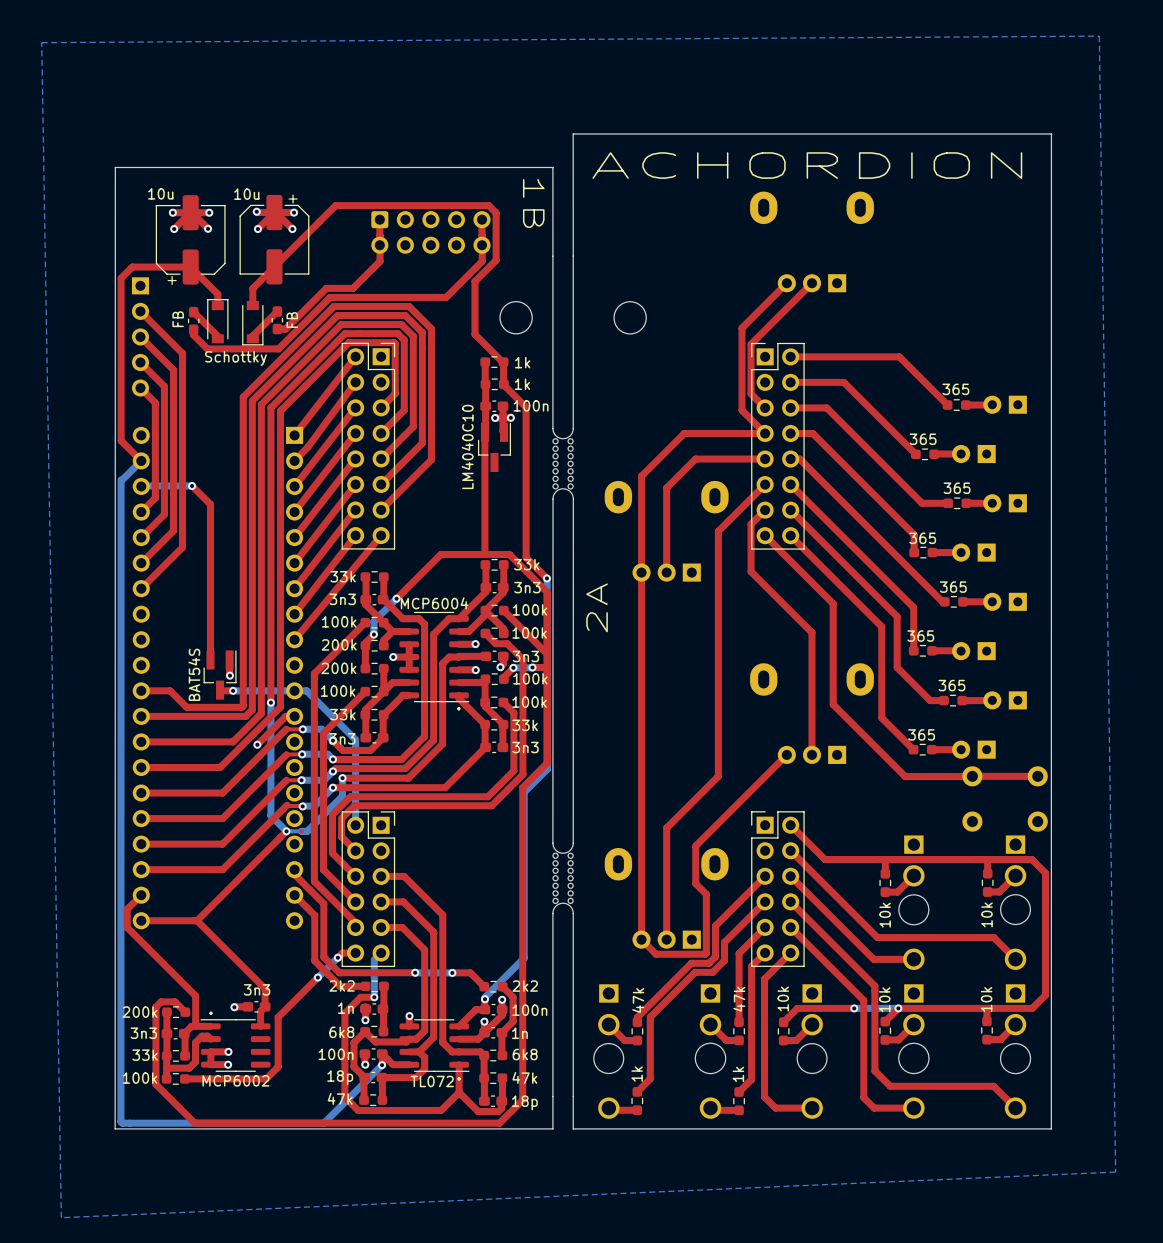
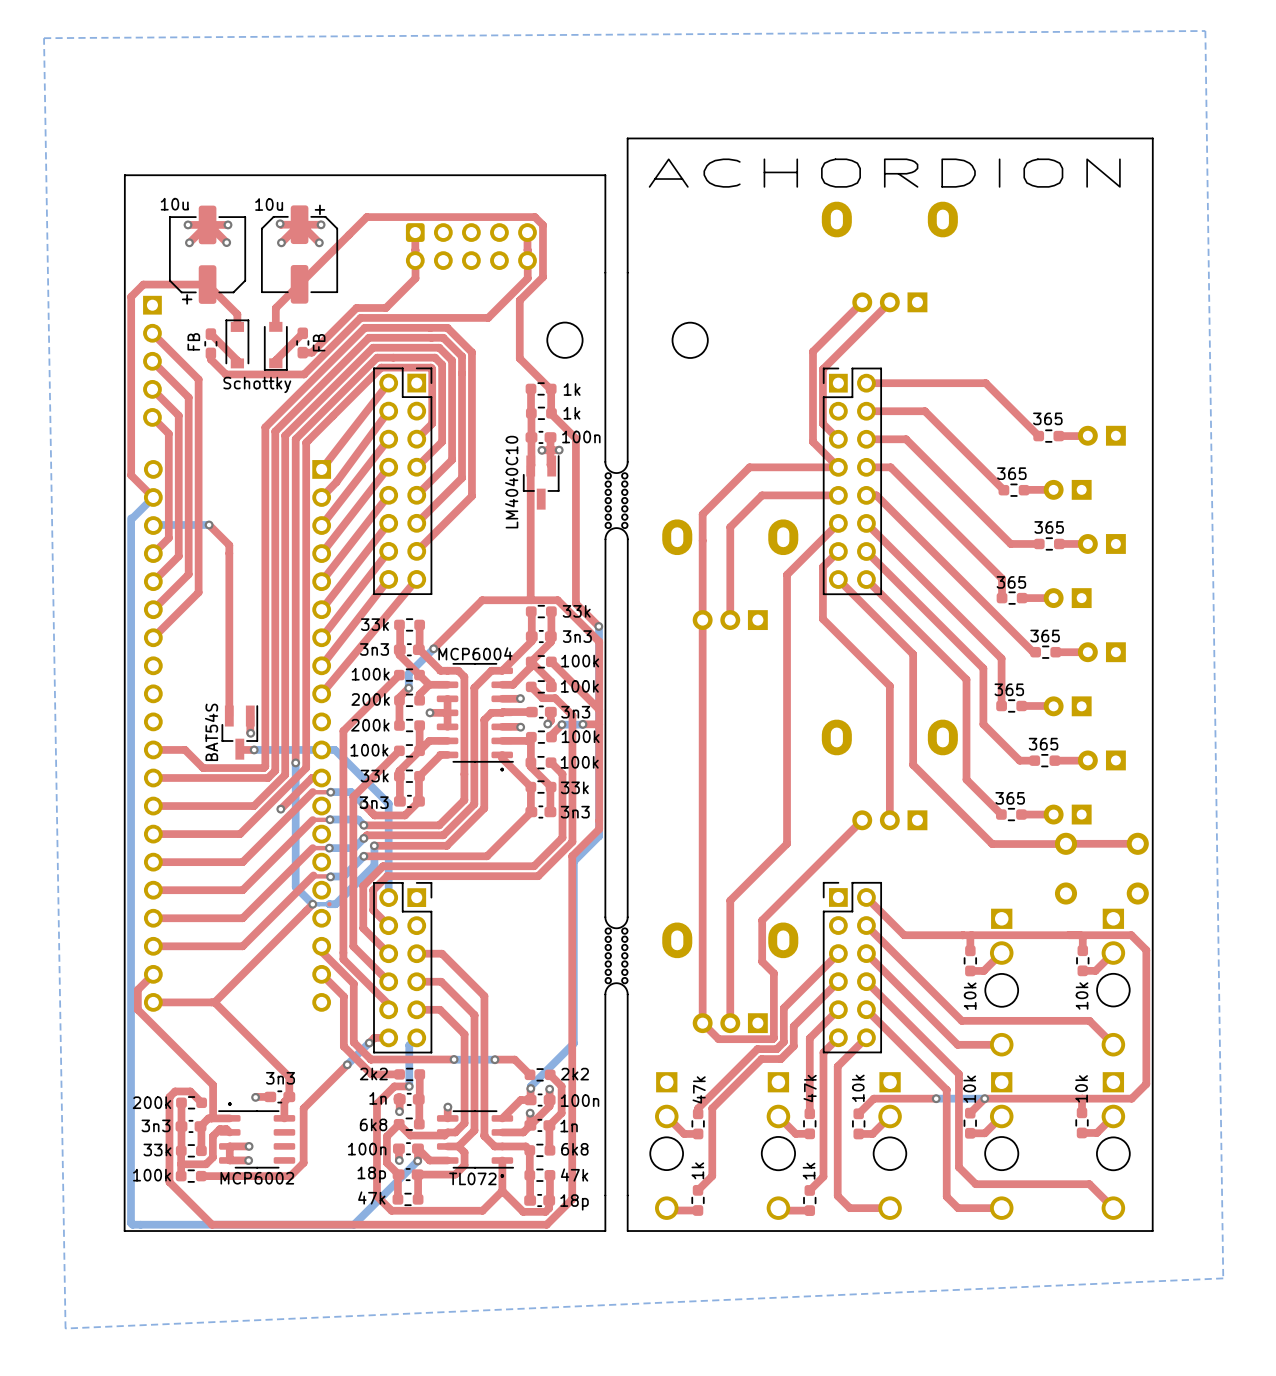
text: 1B (533, 203) -> none
text: 2A (597, 607) -> none

